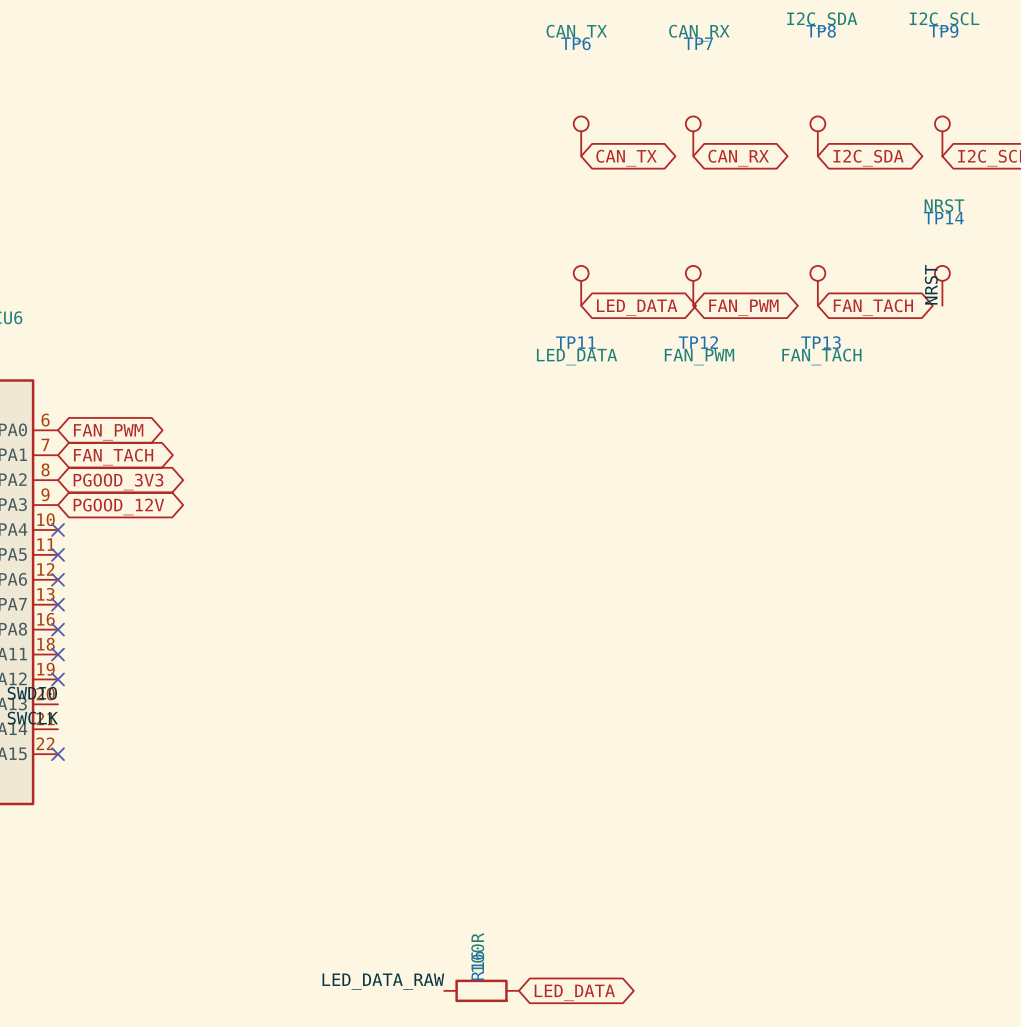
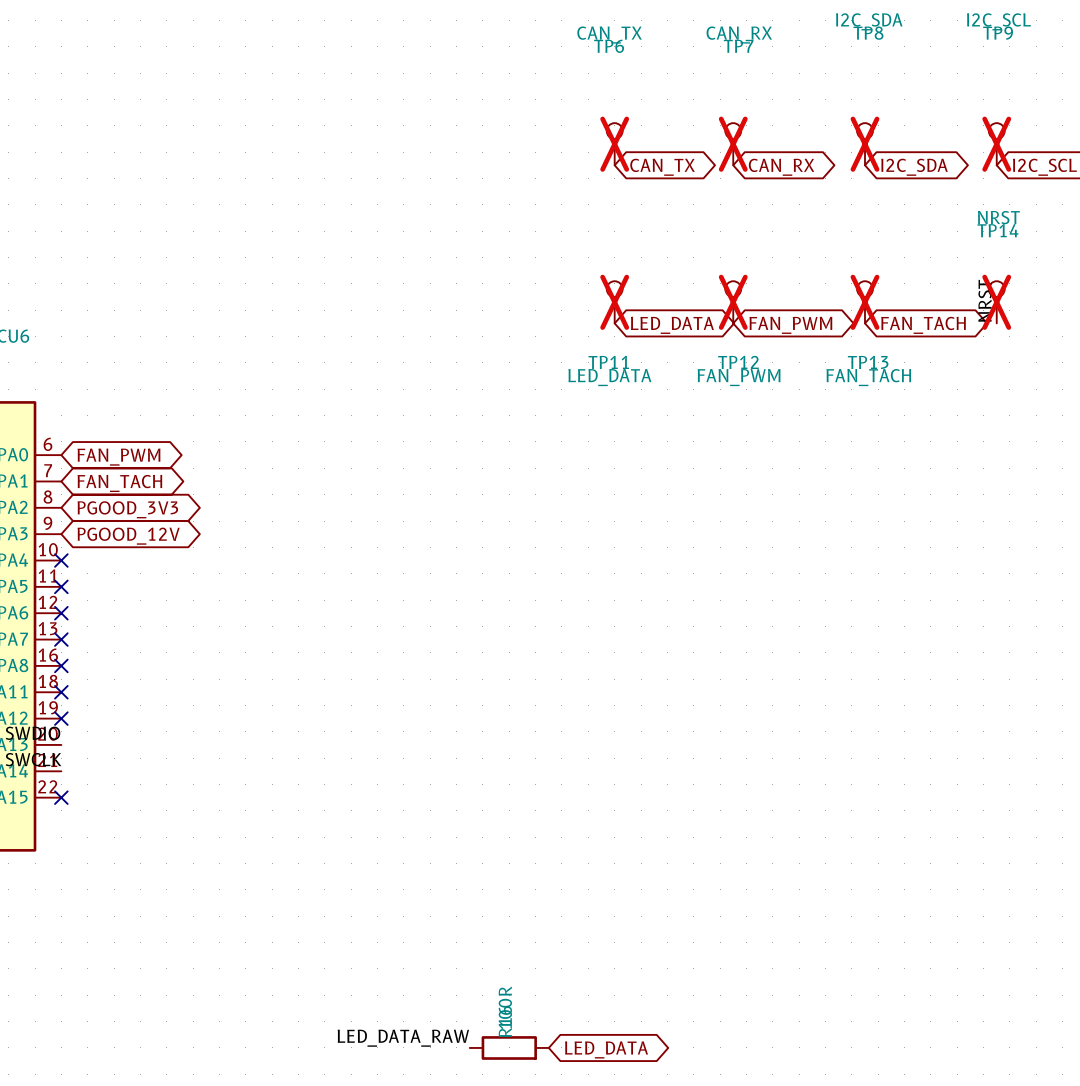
TP6 do-not-place cross: none -> (614, 144)
TP7 do-not-place cross: none -> (733, 144)
TP8 do-not-place cross: none -> (865, 144)
TP9 do-not-place cross: none -> (996, 144)
TP11 do-not-place cross: none -> (614, 302)
TP12 do-not-place cross: none -> (733, 302)
TP13 do-not-place cross: none -> (865, 302)
TP14 do-not-place cross: none -> (996, 302)

